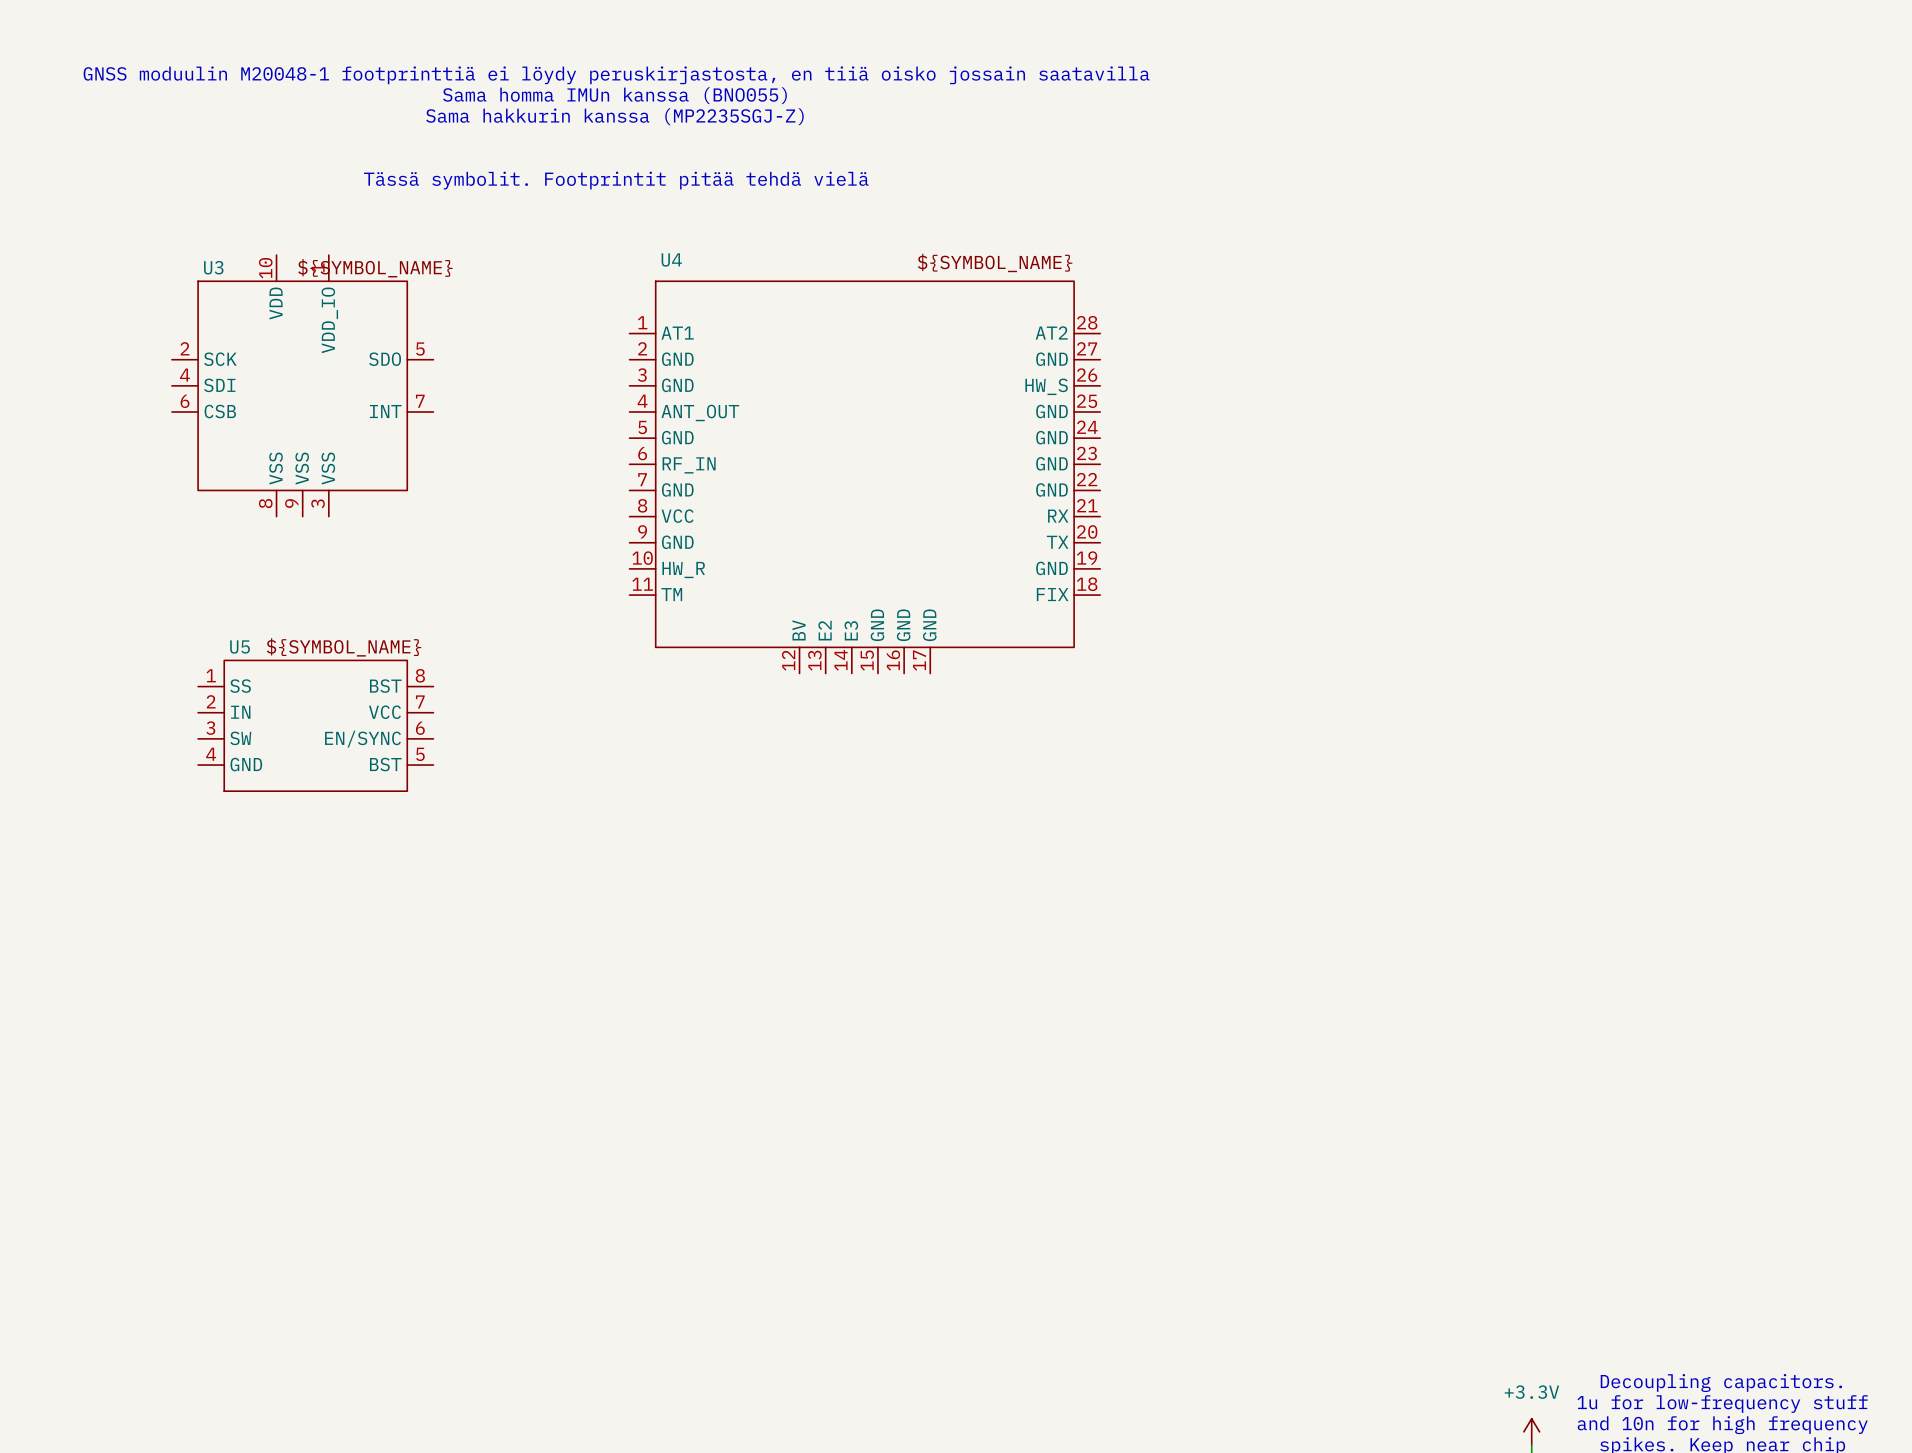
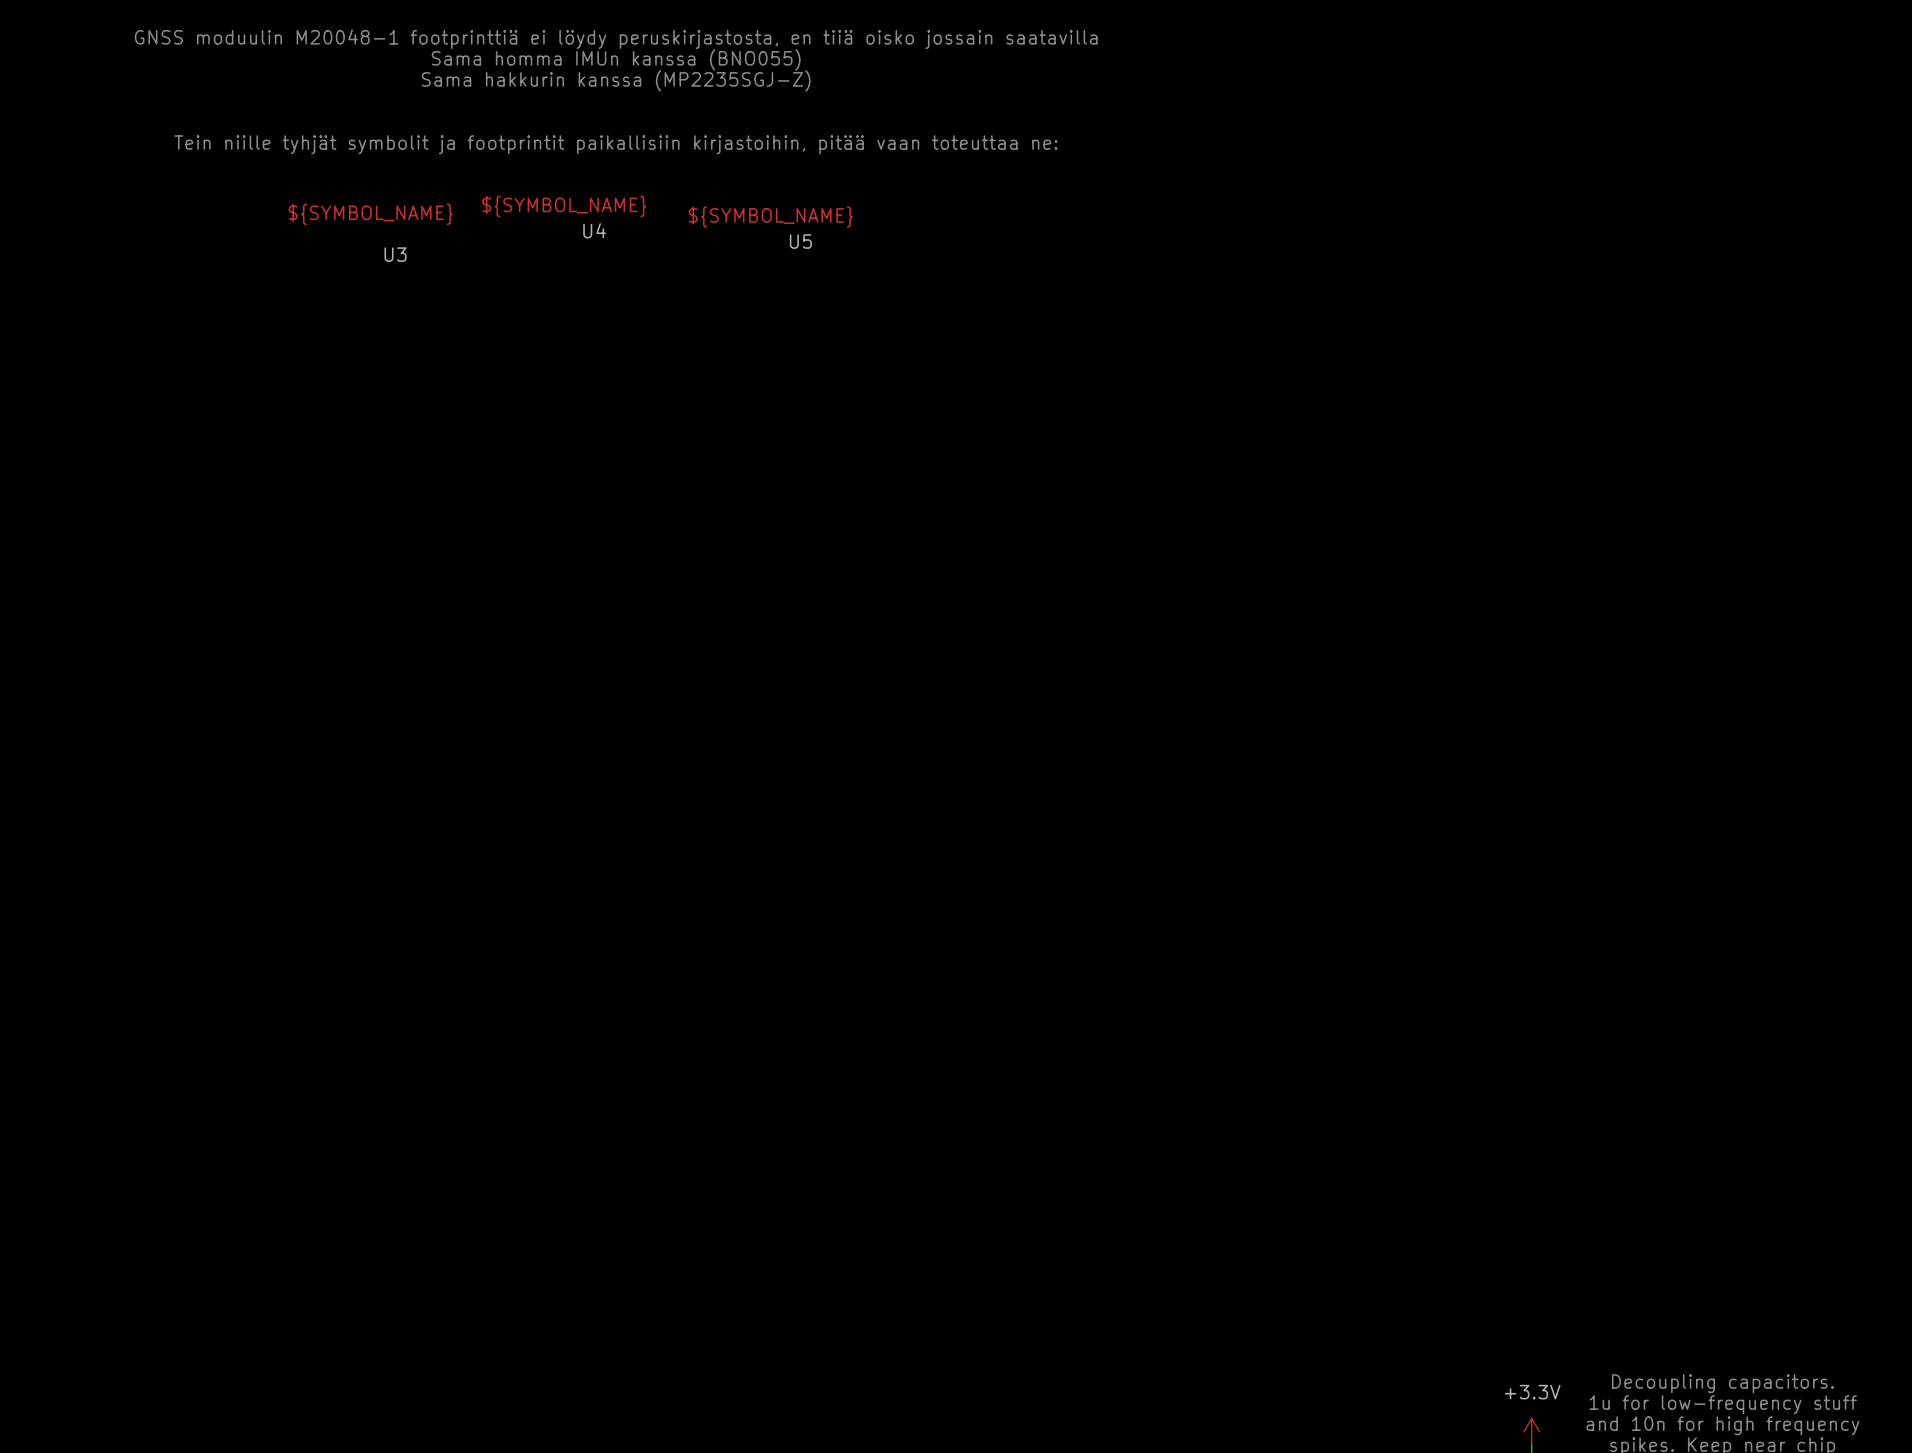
text position: GNSS moduulin M20048-1 footprinttiä ei löydy peruskirjastosta, en tiiä oisko jossain saatavilla (616, 75) -> GNSS moduulin M20048-1 footprinttiä ei löydy peruskirjastosta, en tiiä oisko jossain saatavilla (616, 39)
text position: Sama homma IMUn kanssa (BNO055) (614, 95) -> Sama homma IMUn kanssa (BNO055) (616, 59)
text position: Sama hakkurin kanssa (MP2235SGJ-Z) (614, 116) -> Sama hakkurin kanssa (MP2235SGJ-Z) (616, 80)
text: none -> Tein niille tyhjät symbolit ja footprintit paikallisiin kirjastoihin, pitää vaan toteuttaa ne: (615, 144)
text: Tässä symbolit. Footprintit pitää tehdä vielä (616, 180) -> none
U3 symbol: [171, 255, 434, 517] -> [288, 203, 453, 262]
U4 name position: U4 (671, 259) -> U4 (594, 230)
U3 name position: U3 (213, 267) -> U3 (395, 254)
U4 symbol: [629, 281, 1101, 674] -> [482, 195, 647, 239]
U5 name position: U5 (240, 646) -> U5 (800, 241)
U5 symbol: [198, 660, 434, 792] -> [688, 206, 853, 249]

